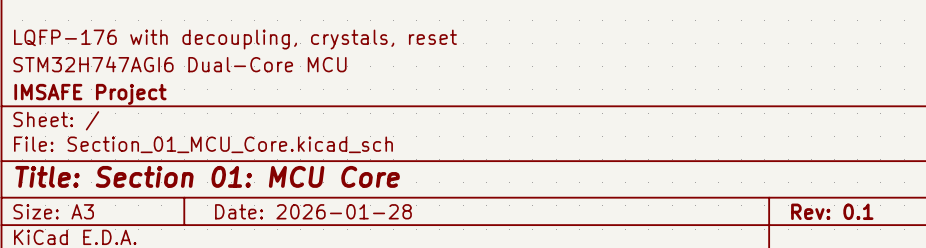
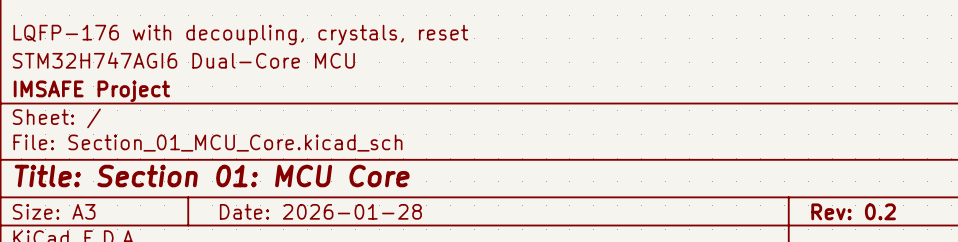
title block: Rev: 0.1 (832, 211) -> Rev: 0.2 (853, 211)

